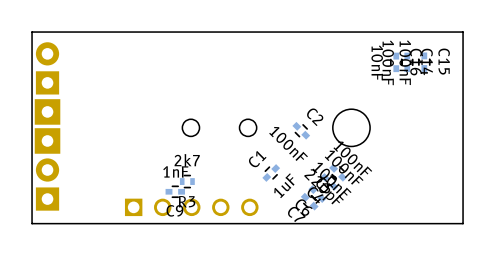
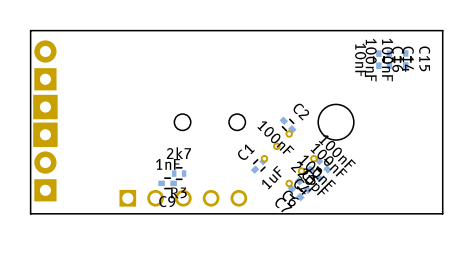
part: none -> (289, 158)

